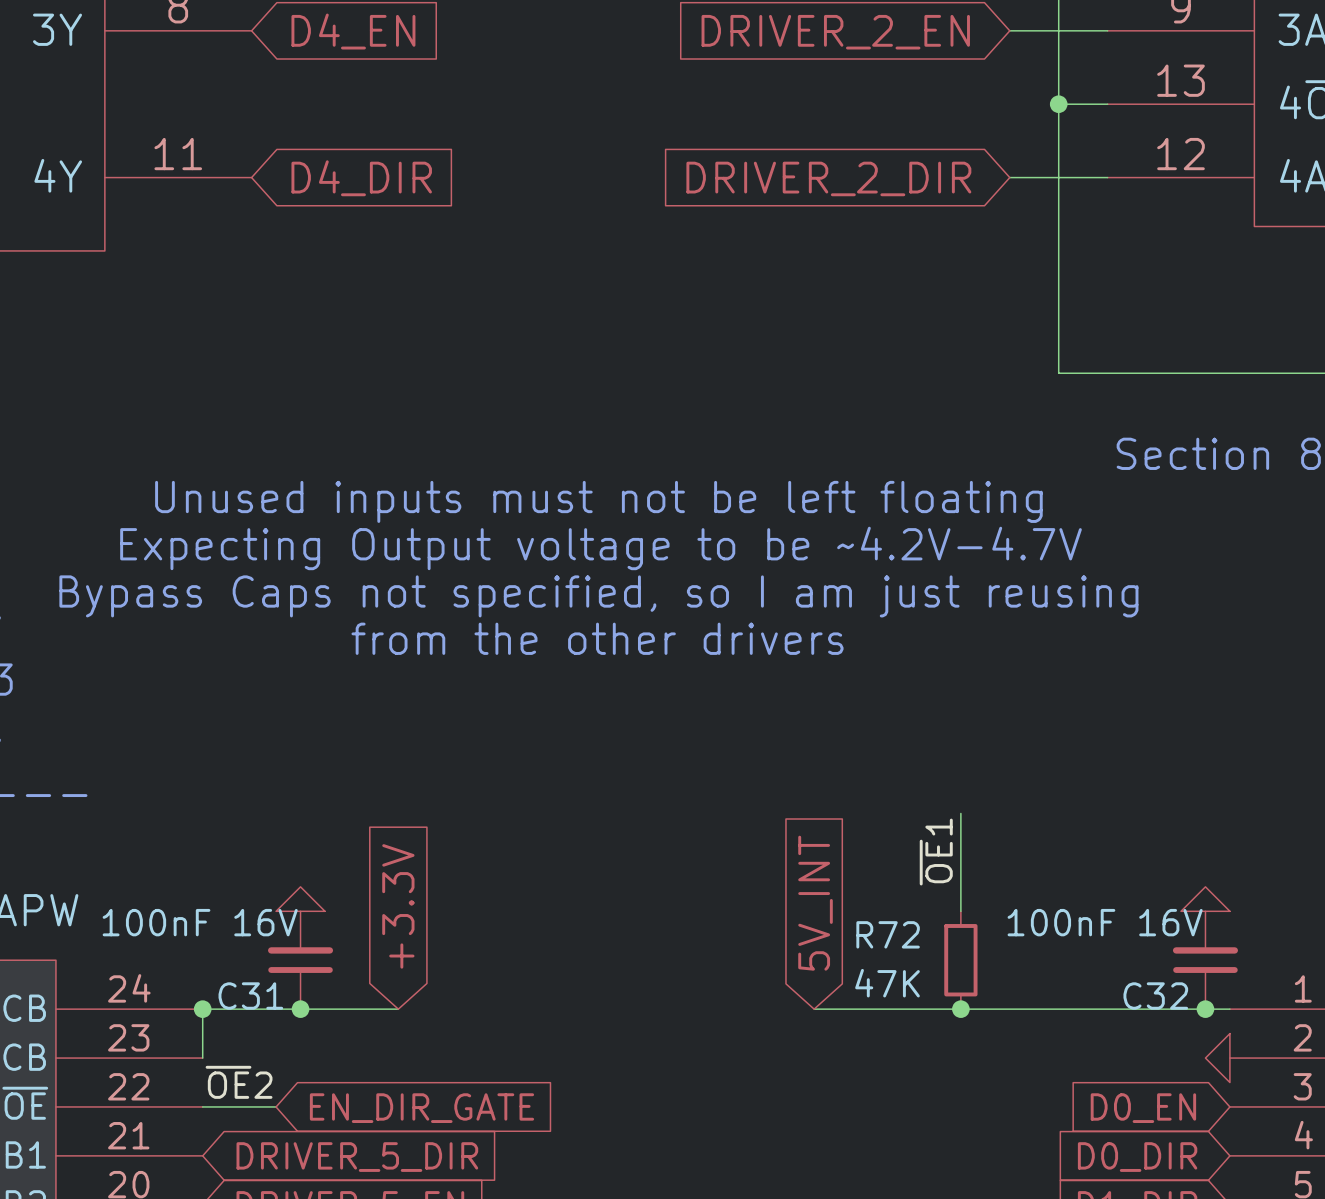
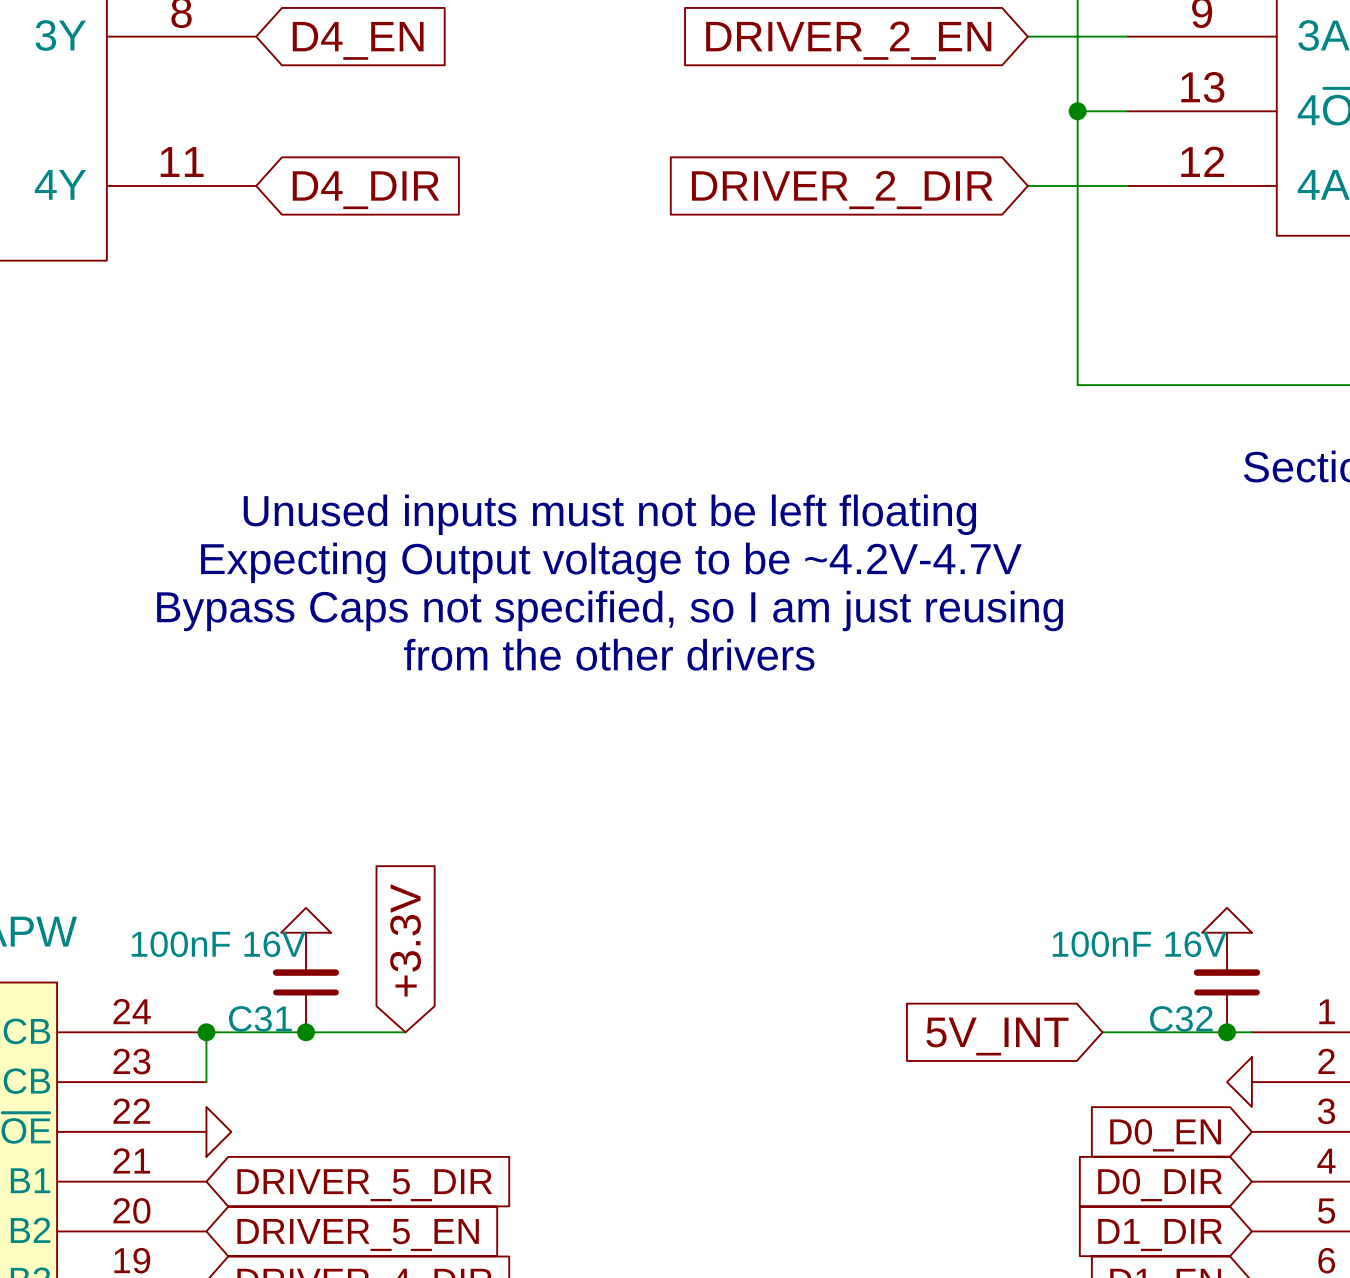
wire: (960, 813) (960, 911) -> none
label: ~{OE}1 (936, 852) -> none
global label rotation: 0° (815, 903) -> 90° counterclockwise (997, 1036)
R72: 47K (960, 960) -> none
wire: (814, 1009) (1083, 1009) -> none
junction: (960, 1009) -> none
label: ~{OE}2 (239, 1082) -> none
wire: (202, 1106) (276, 1106) -> none
power symbol: none -> (218, 1131)
global label: EN_DIR_GATE (421, 1108) -> none

